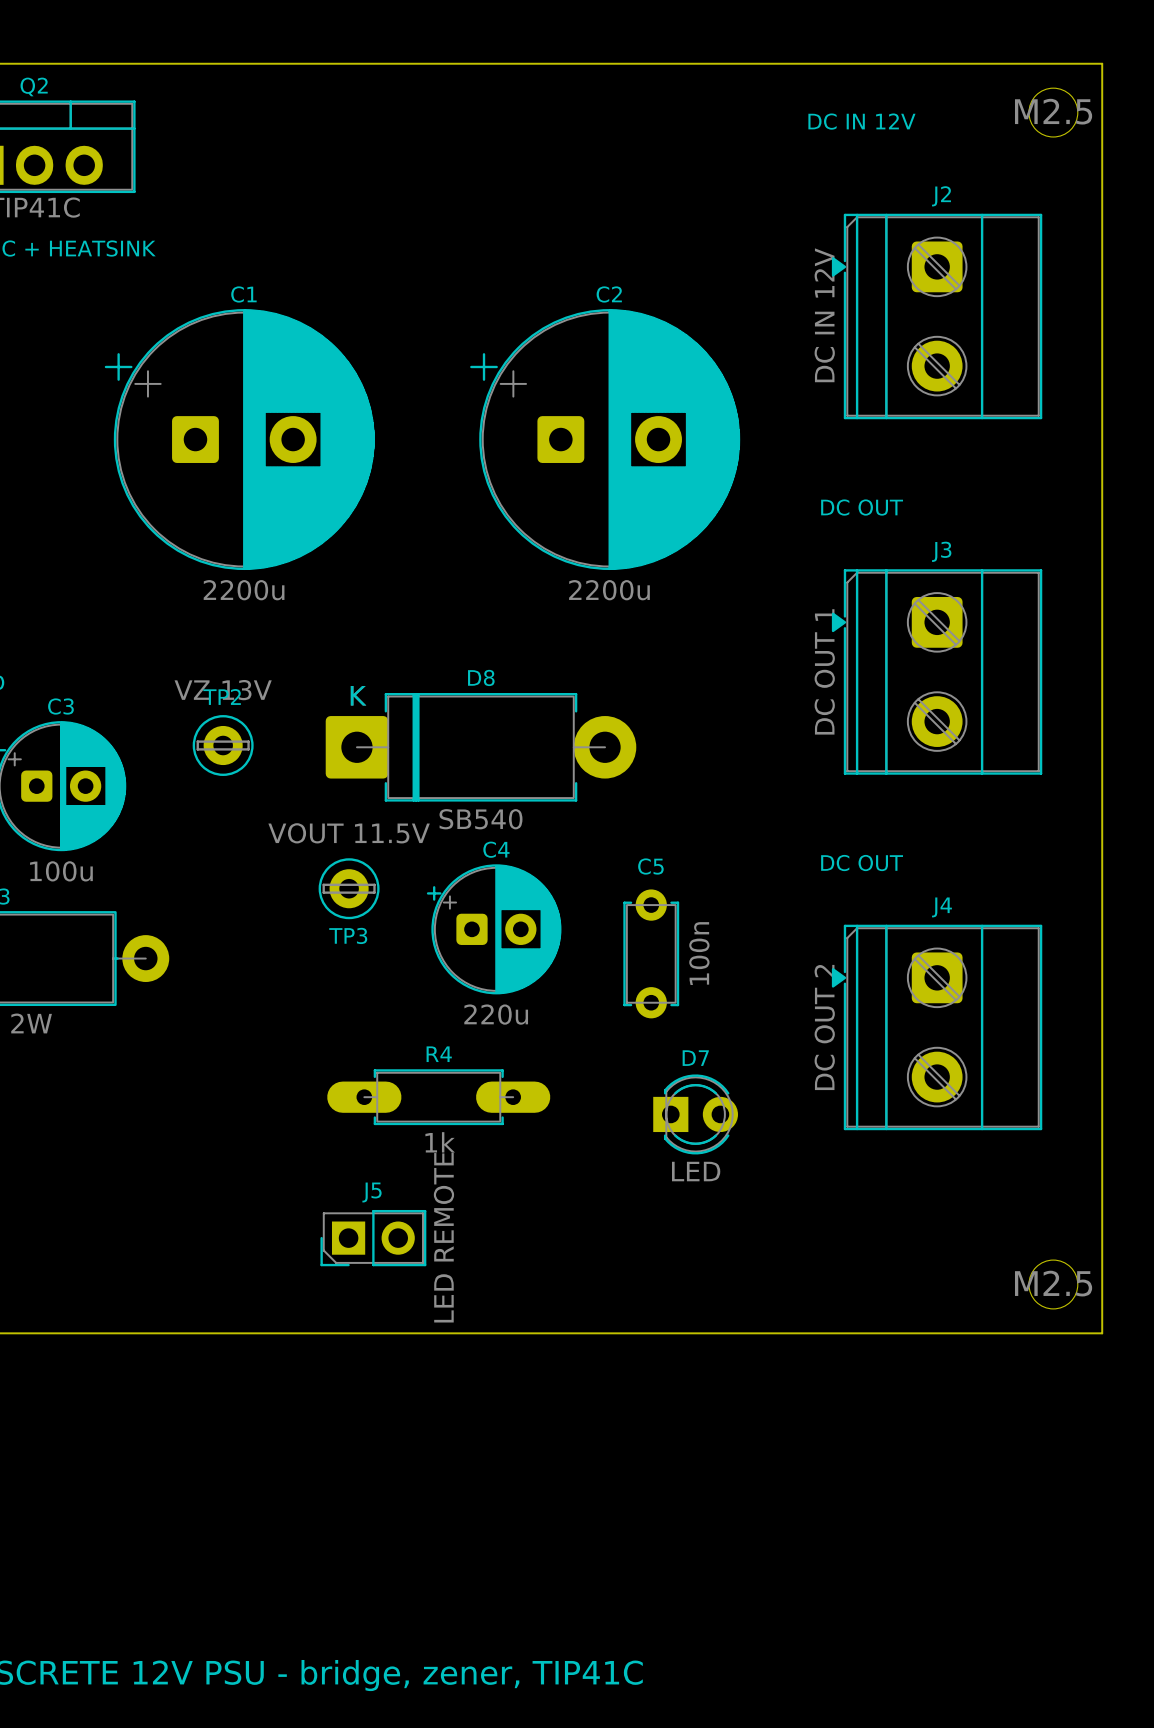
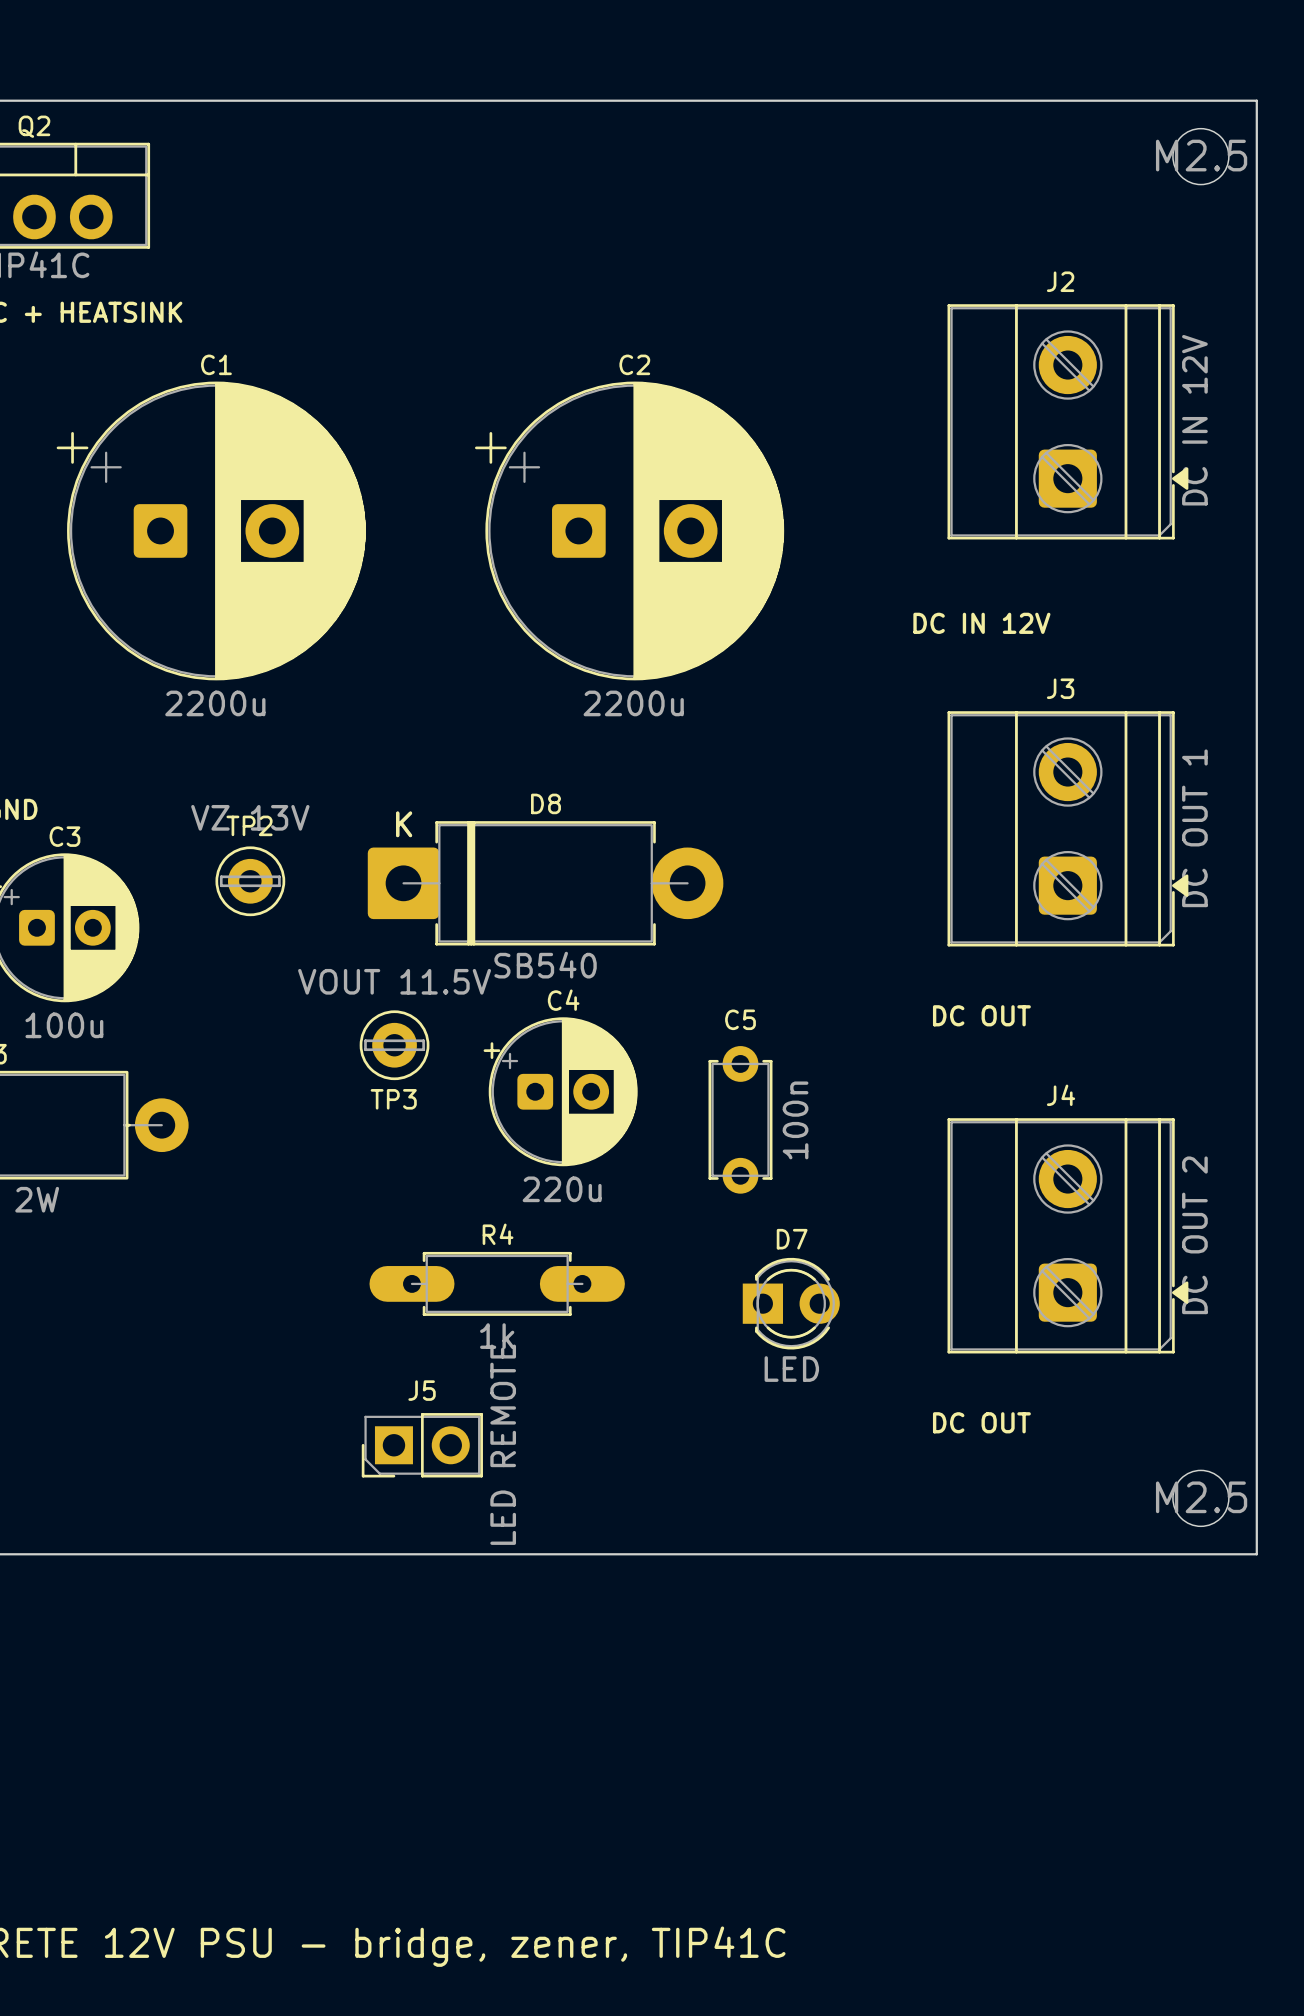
text: DC IN 12V (861, 121) -> none
J2 rotation: 0° (937, 316) -> 180° (1067, 421)
C1 position: (239, 439) -> (211, 530)
C2 position: (605, 439) -> (629, 530)
text: DC OUT (862, 507) -> DC IN 12V (981, 623)
J3 rotation: 0° (937, 671) -> 180° (1067, 828)
J4 rotation: 0° (937, 1027) -> 180° (1067, 1235)
text: none -> DC OUT (981, 1422)

